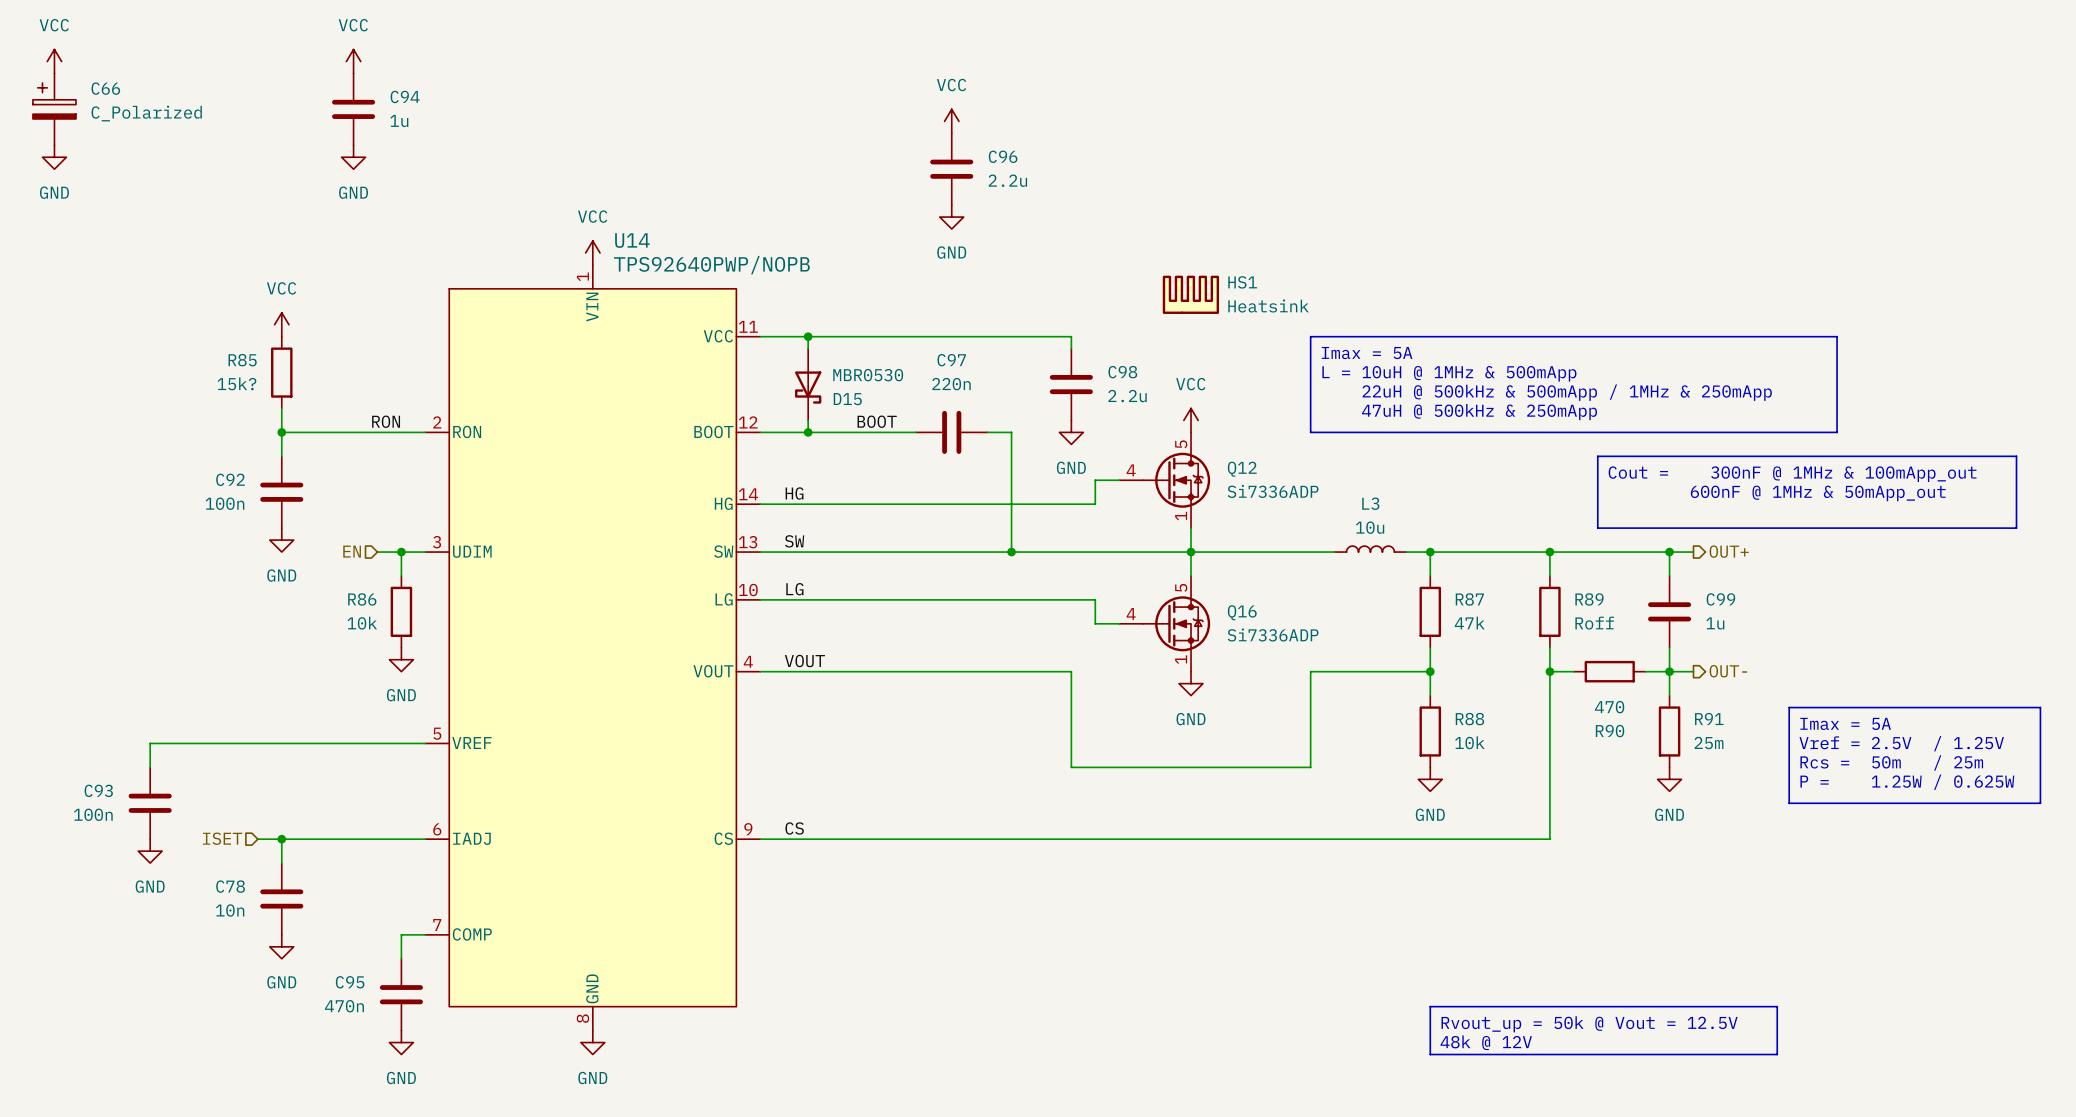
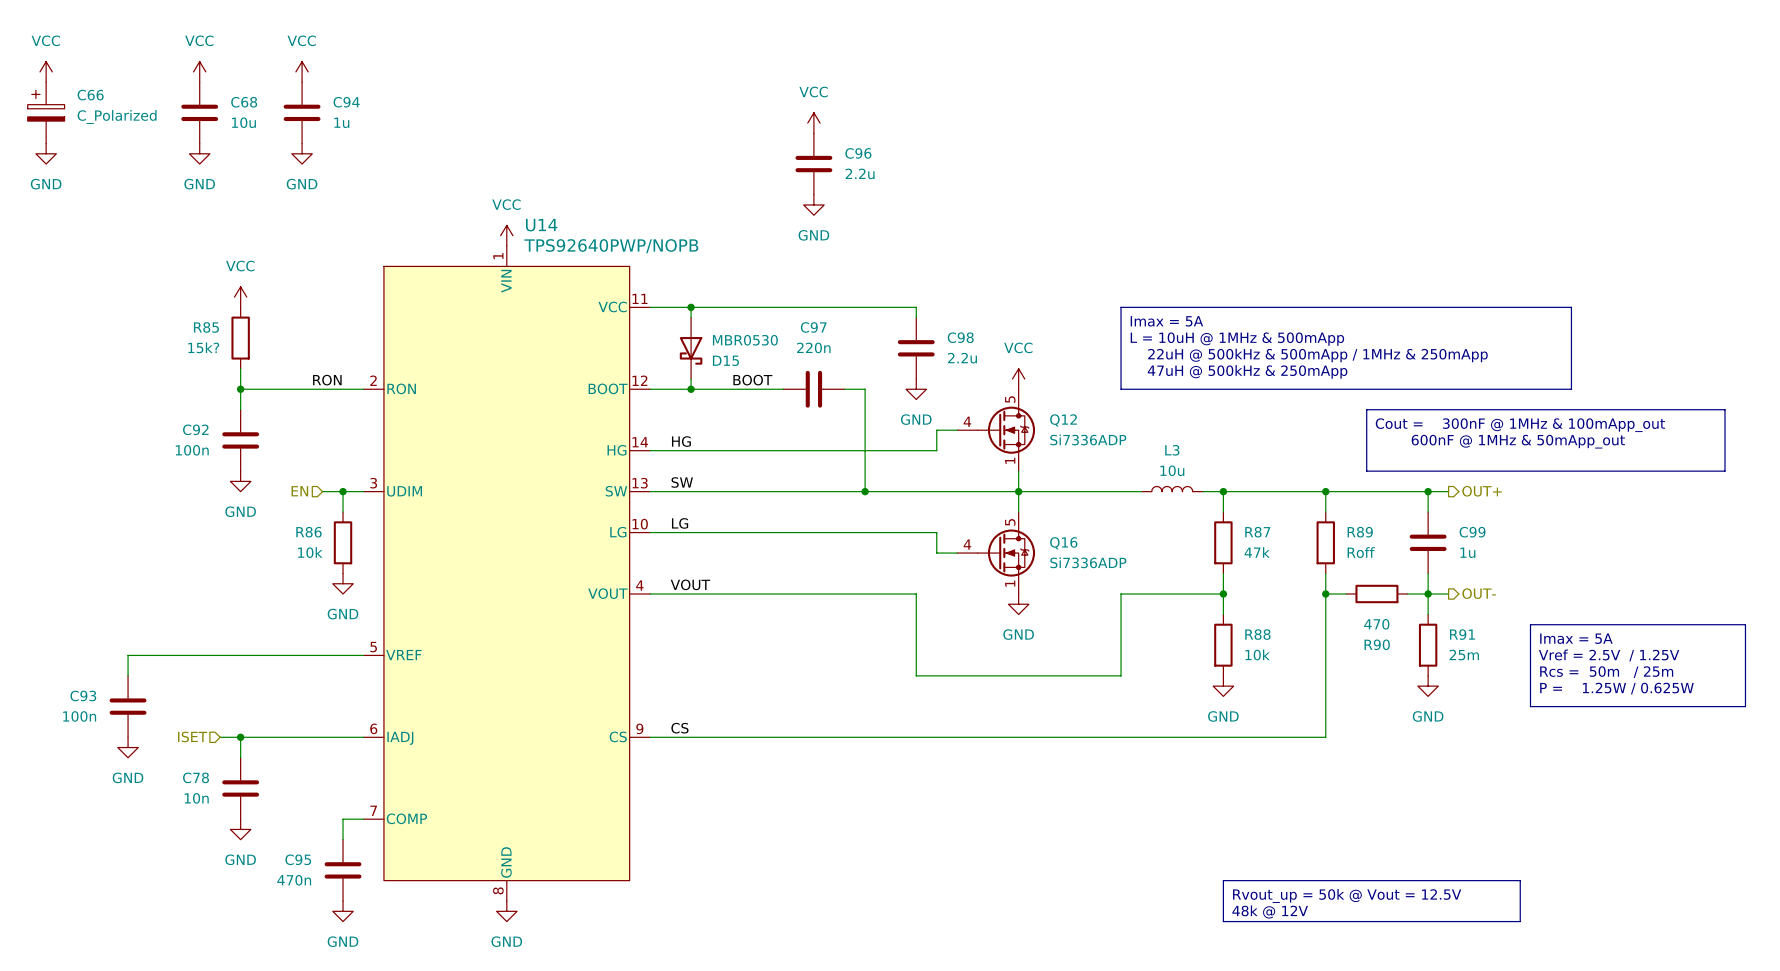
power symbol: none -> VCC (199, 71)
C68: none -> 10u (199, 112)
power symbol: none -> GND (199, 153)
HS1: Heatsink (1190, 294) -> none

